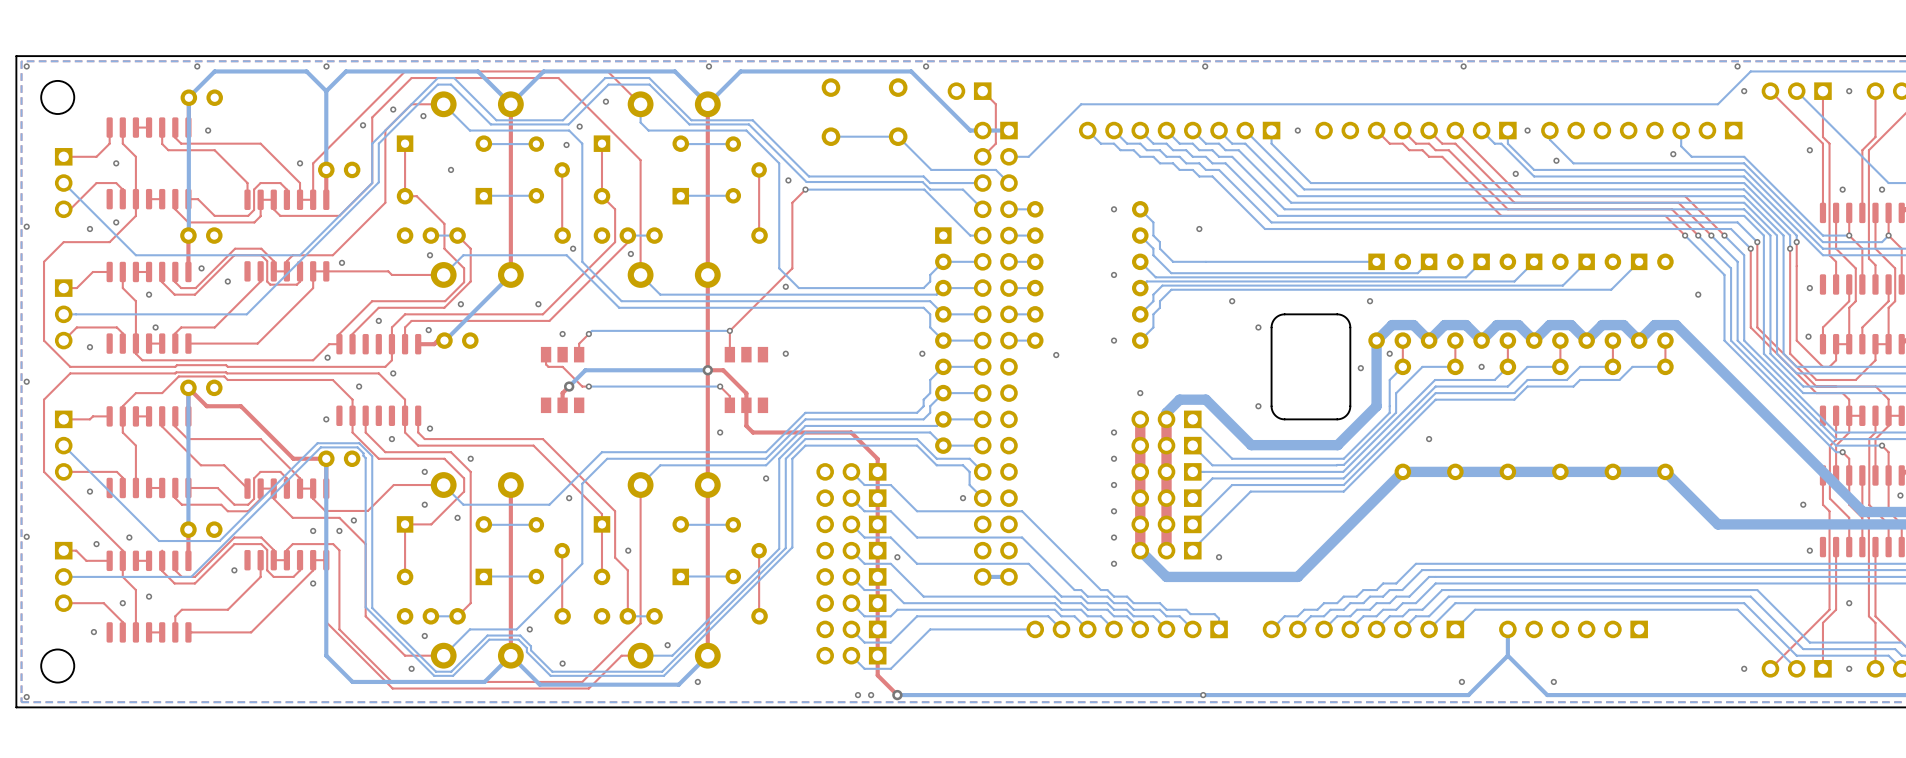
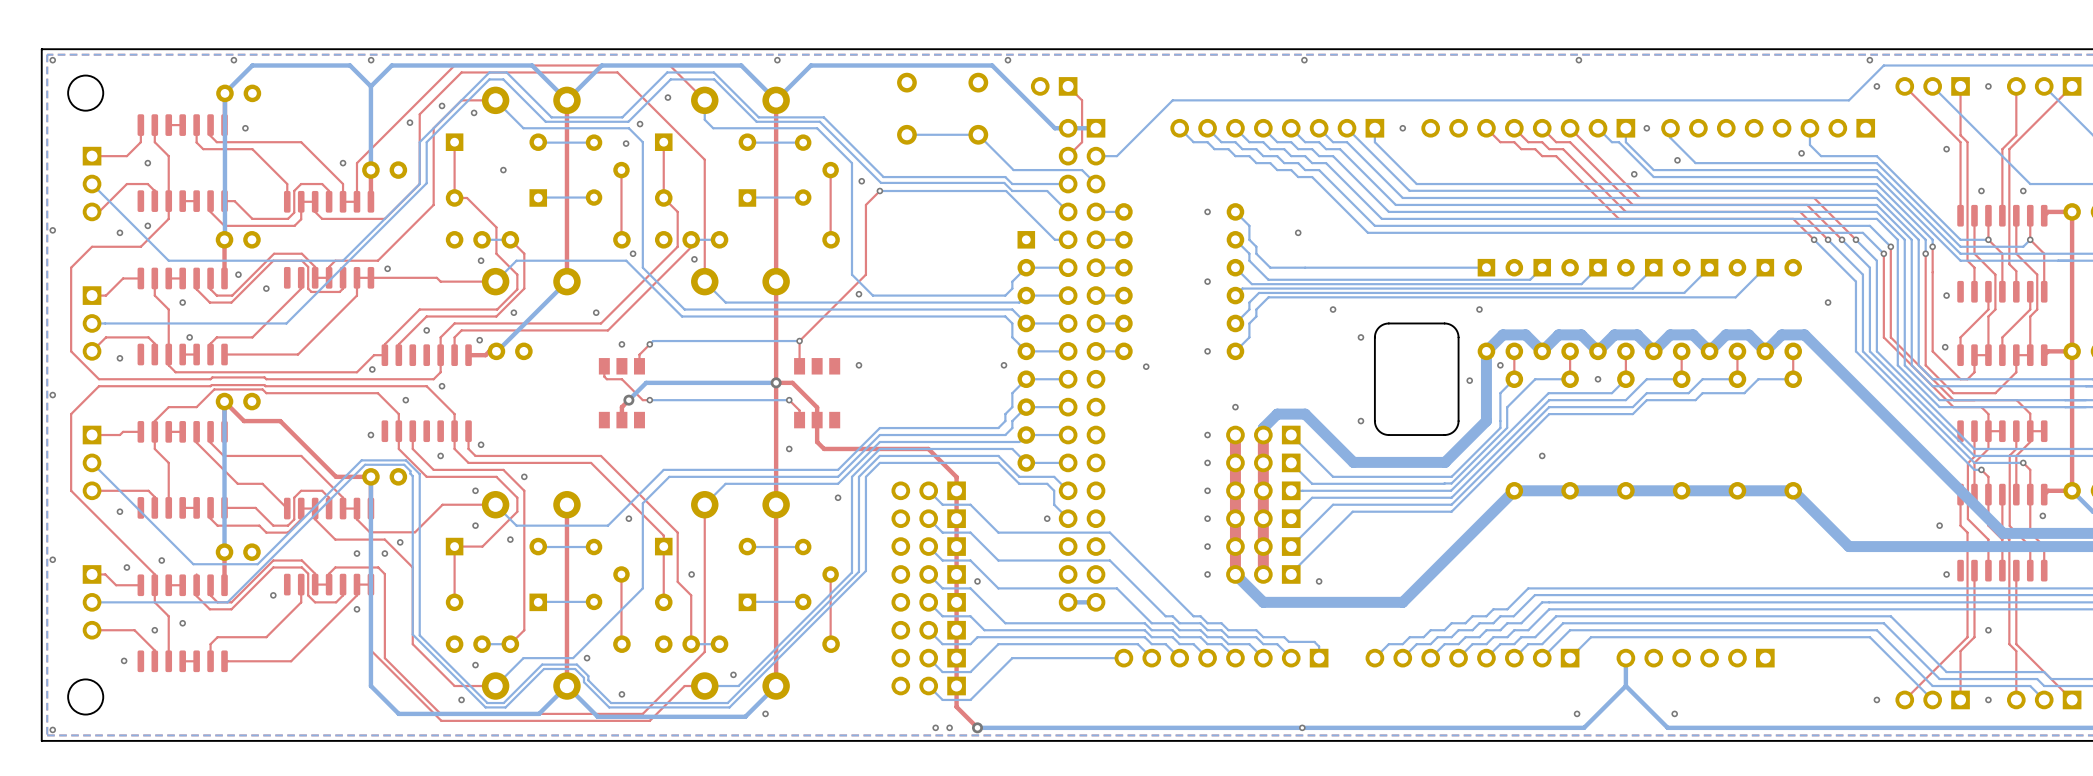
via: none -> (1207, 435)
via: (1114, 432) -> none
via: none -> (1207, 462)
via: (1114, 458) -> none
via: none -> (1207, 490)
via: (1114, 485) -> none
via: none -> (1207, 518)
via: (1114, 511) -> none
via: none -> (1207, 546)
via: (1114, 537) -> none
via: none -> (1207, 574)
via: (1114, 563) -> none

